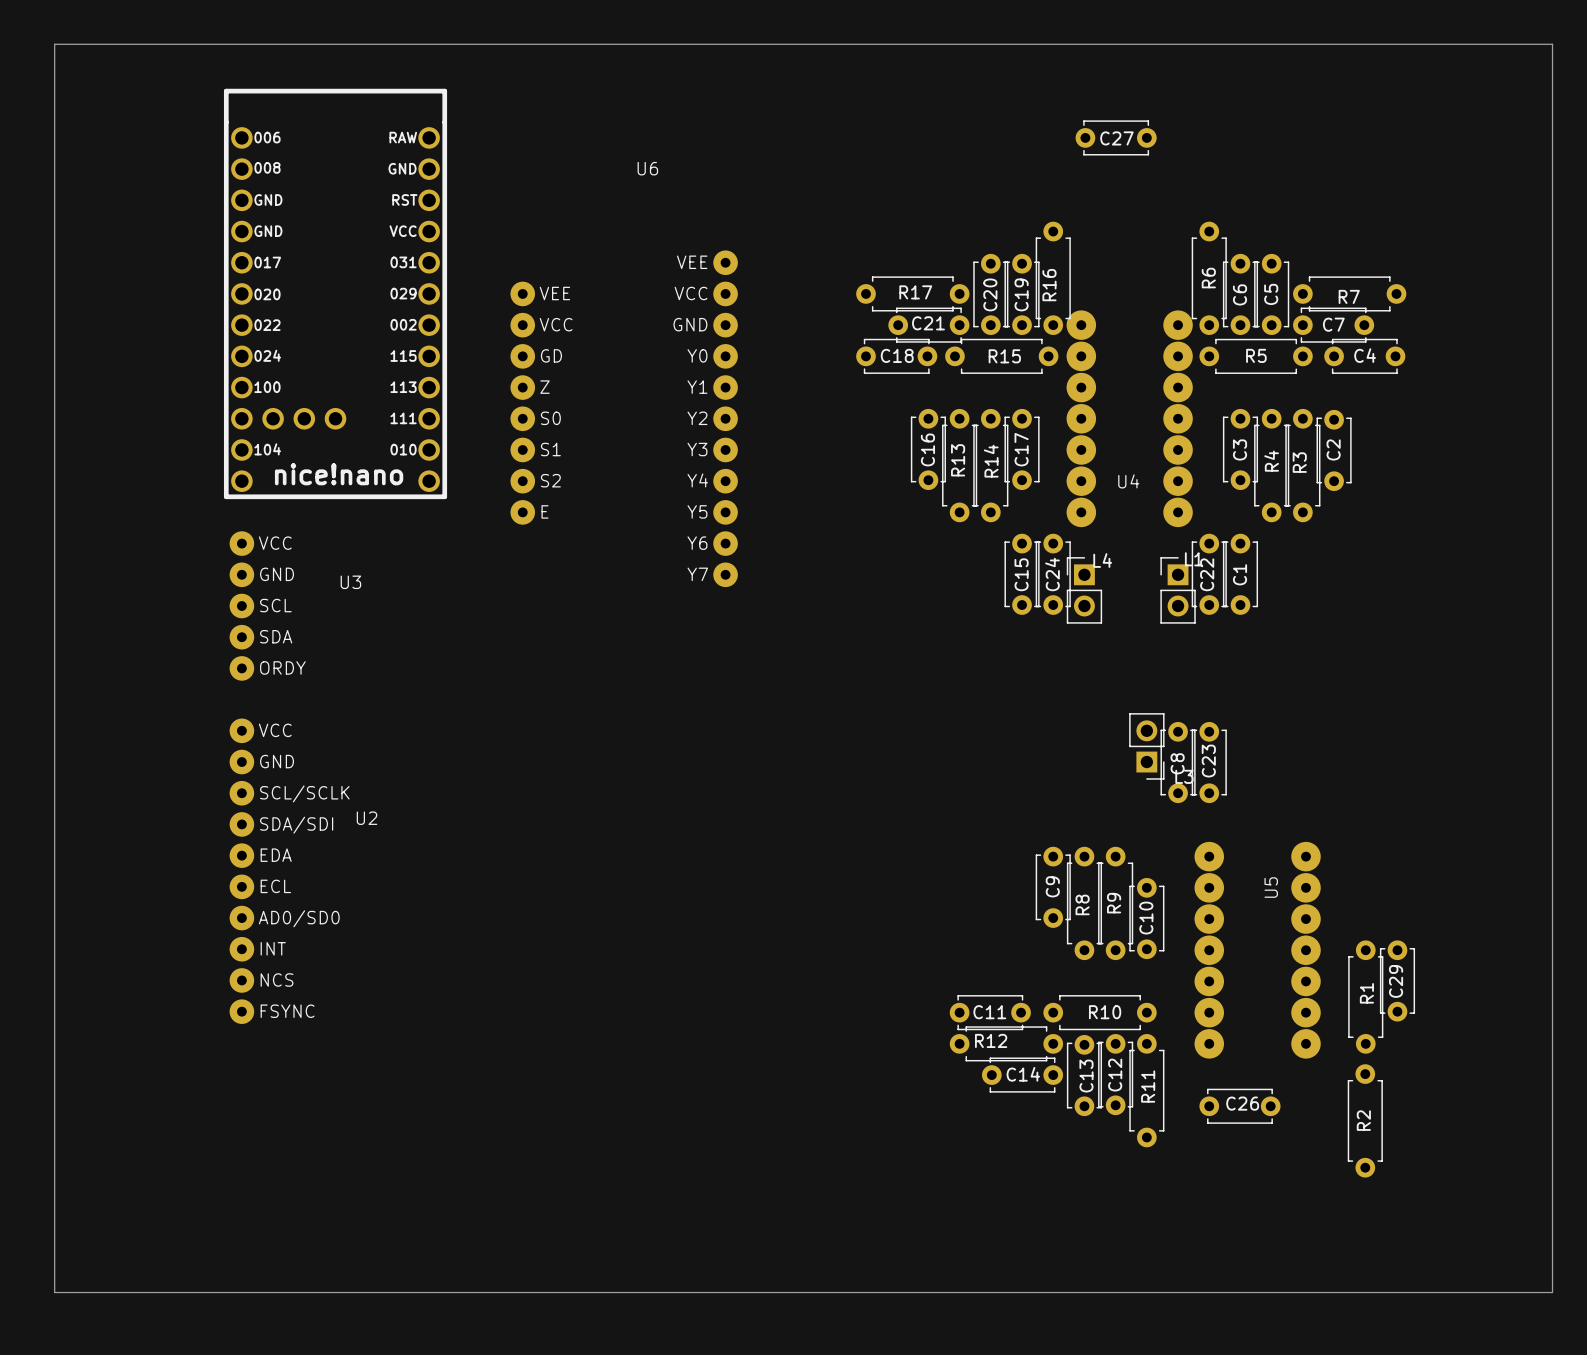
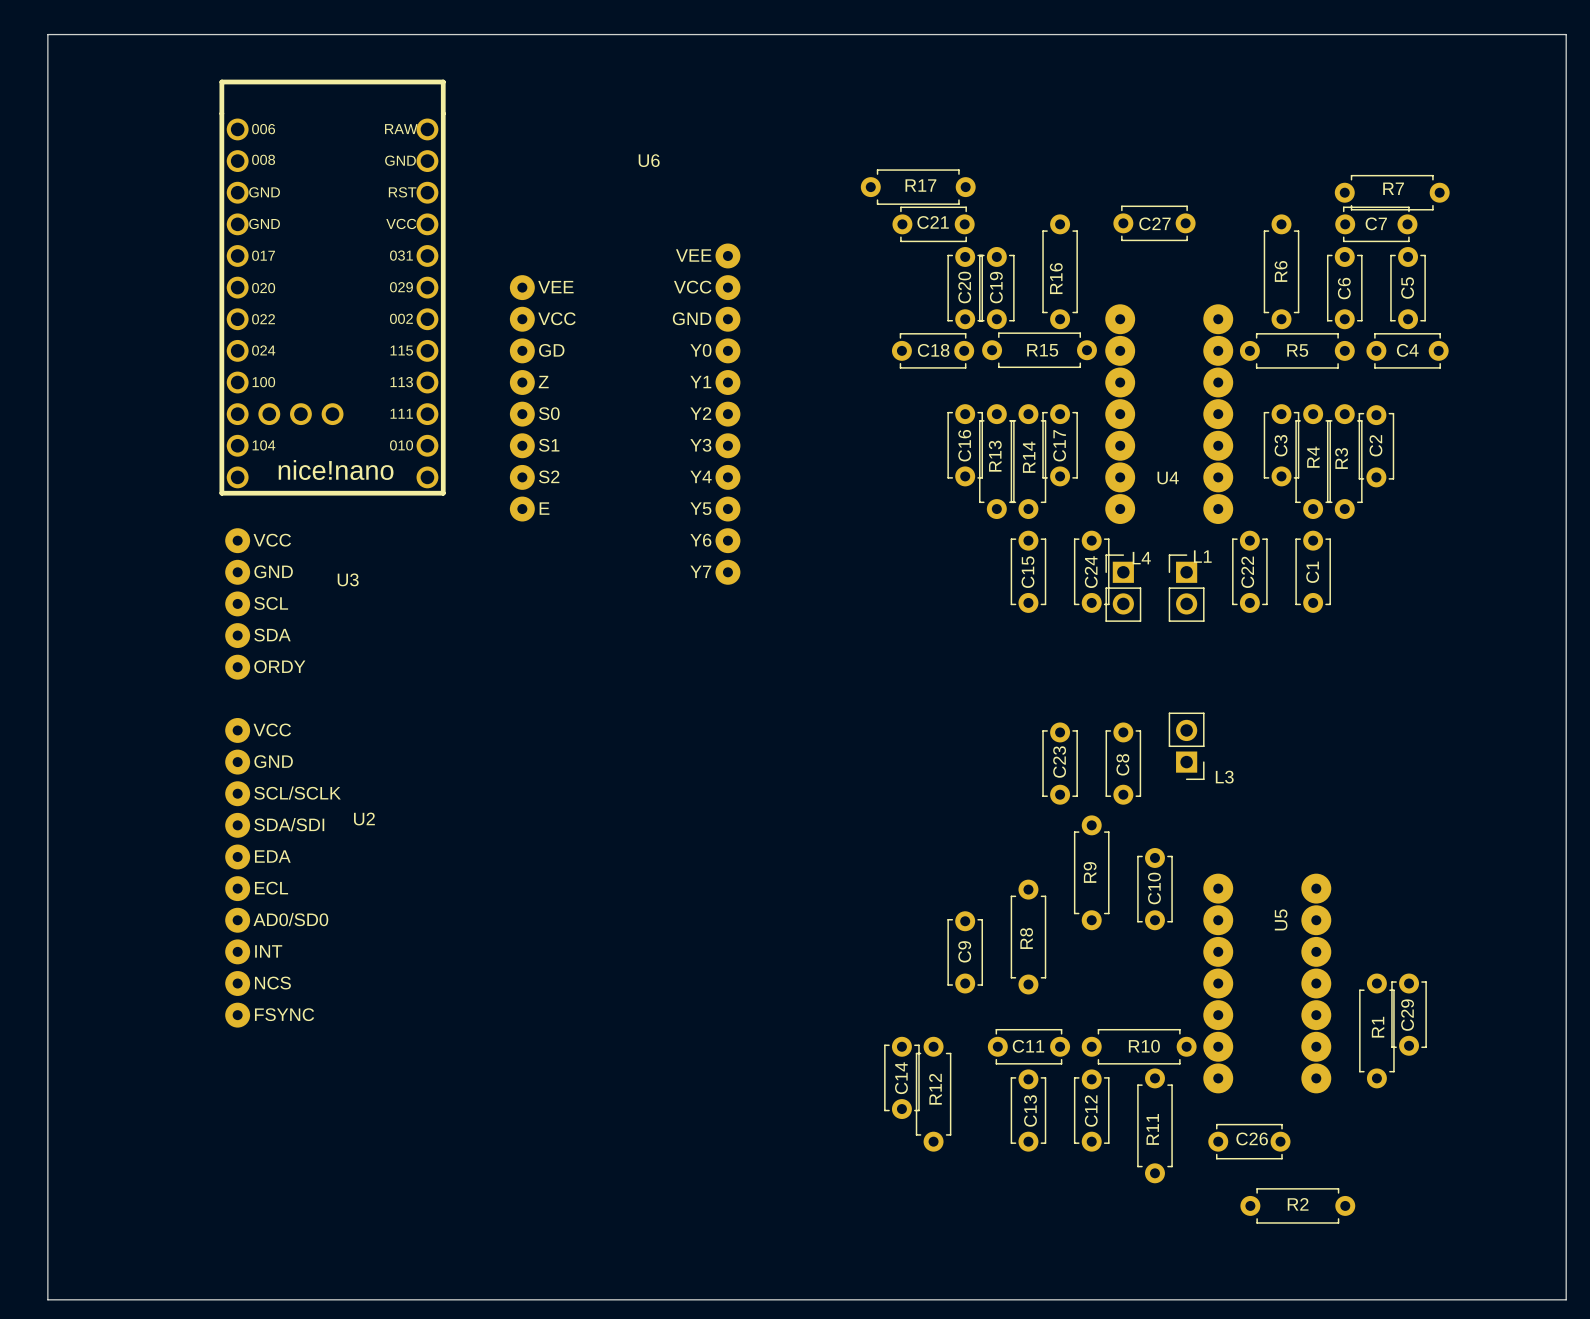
C27 position: (1116, 137) -> (1154, 223)
R6 position: (1209, 278) -> (1281, 271)
R17 position: (912, 293) -> (918, 187)
R7 position: (1349, 293) -> (1392, 192)
C20: none -> (965, 288)
C20 name: C20 (990, 294) -> C19 (996, 287)
C19: (1022, 294) -> none
C6 position: (1240, 294) -> (1344, 288)
C5 position: (1271, 294) -> (1408, 288)
R7 name position: R7 (1349, 296) -> R7 (1393, 188)
C21 position: (928, 325) -> (933, 224)
C7 position: (1333, 325) -> (1376, 224)
C18 position: (896, 356) -> (933, 350)
R15 position: (1001, 356) -> (1039, 350)
R5 position: (1256, 356) -> (1297, 350)
C4 position: (1364, 356) -> (1407, 350)
U4 position: (1129, 418) -> (1169, 414)
C16 position: (928, 449) -> (965, 445)
C17 position: (1022, 449) -> (1060, 445)
C3 position: (1240, 449) -> (1281, 445)
C2 position: (1334, 450) -> (1376, 446)
R14 name: R14 (991, 461) -> R13 (995, 456)
R3 name: R3 (1299, 462) -> R4 (1313, 457)
R13: (959, 465) -> none
R14: none -> (1028, 461)
R4: (1271, 465) -> none
R3: none -> (1344, 461)
C24 position: (1053, 574) -> (1091, 571)
C22: (1209, 574) -> none
C1 name: C1 (1240, 574) -> C22 (1247, 572)
C1: none -> (1313, 571)
L4 position: (1084, 590) -> (1123, 588)
L3 position: (1146, 746) -> (1186, 746)
C8 position: (1178, 762) -> (1123, 763)
C23 position: (1209, 762) -> (1060, 763)
C9 position: (1053, 887) -> (965, 952)
R8 position: (1084, 903) -> (1028, 937)
R9 position: (1115, 903) -> (1091, 872)
C10 position: (1146, 918) -> (1154, 889)
U5 position: (1257, 950) -> (1267, 983)
C29 position: (1397, 980) -> (1409, 1014)
R1 position: (1365, 997) -> (1376, 1030)
C11 position: (990, 1012) -> (1028, 1046)
R10 position: (1100, 1012) -> (1139, 1046)
R12 rotation: 0° (1006, 1043) -> 90° clockwise (933, 1094)
R12 position: (1006, 1043) -> (933, 1094)
C12 position: (1115, 1074) -> (1091, 1110)
C14 rotation: 0° (1022, 1075) -> 90° clockwise (901, 1077)
C14 position: (1022, 1075) -> (901, 1077)
C13 position: (1084, 1075) -> (1028, 1110)
R11 name position: R11 (1148, 1086) -> R11 (1152, 1129)
R11 position: (1146, 1090) -> (1154, 1125)
C26 position: (1239, 1106) -> (1249, 1141)
R2 rotation: 0° (1365, 1120) -> 90° clockwise (1297, 1205)
R2 position: (1365, 1120) -> (1297, 1205)

